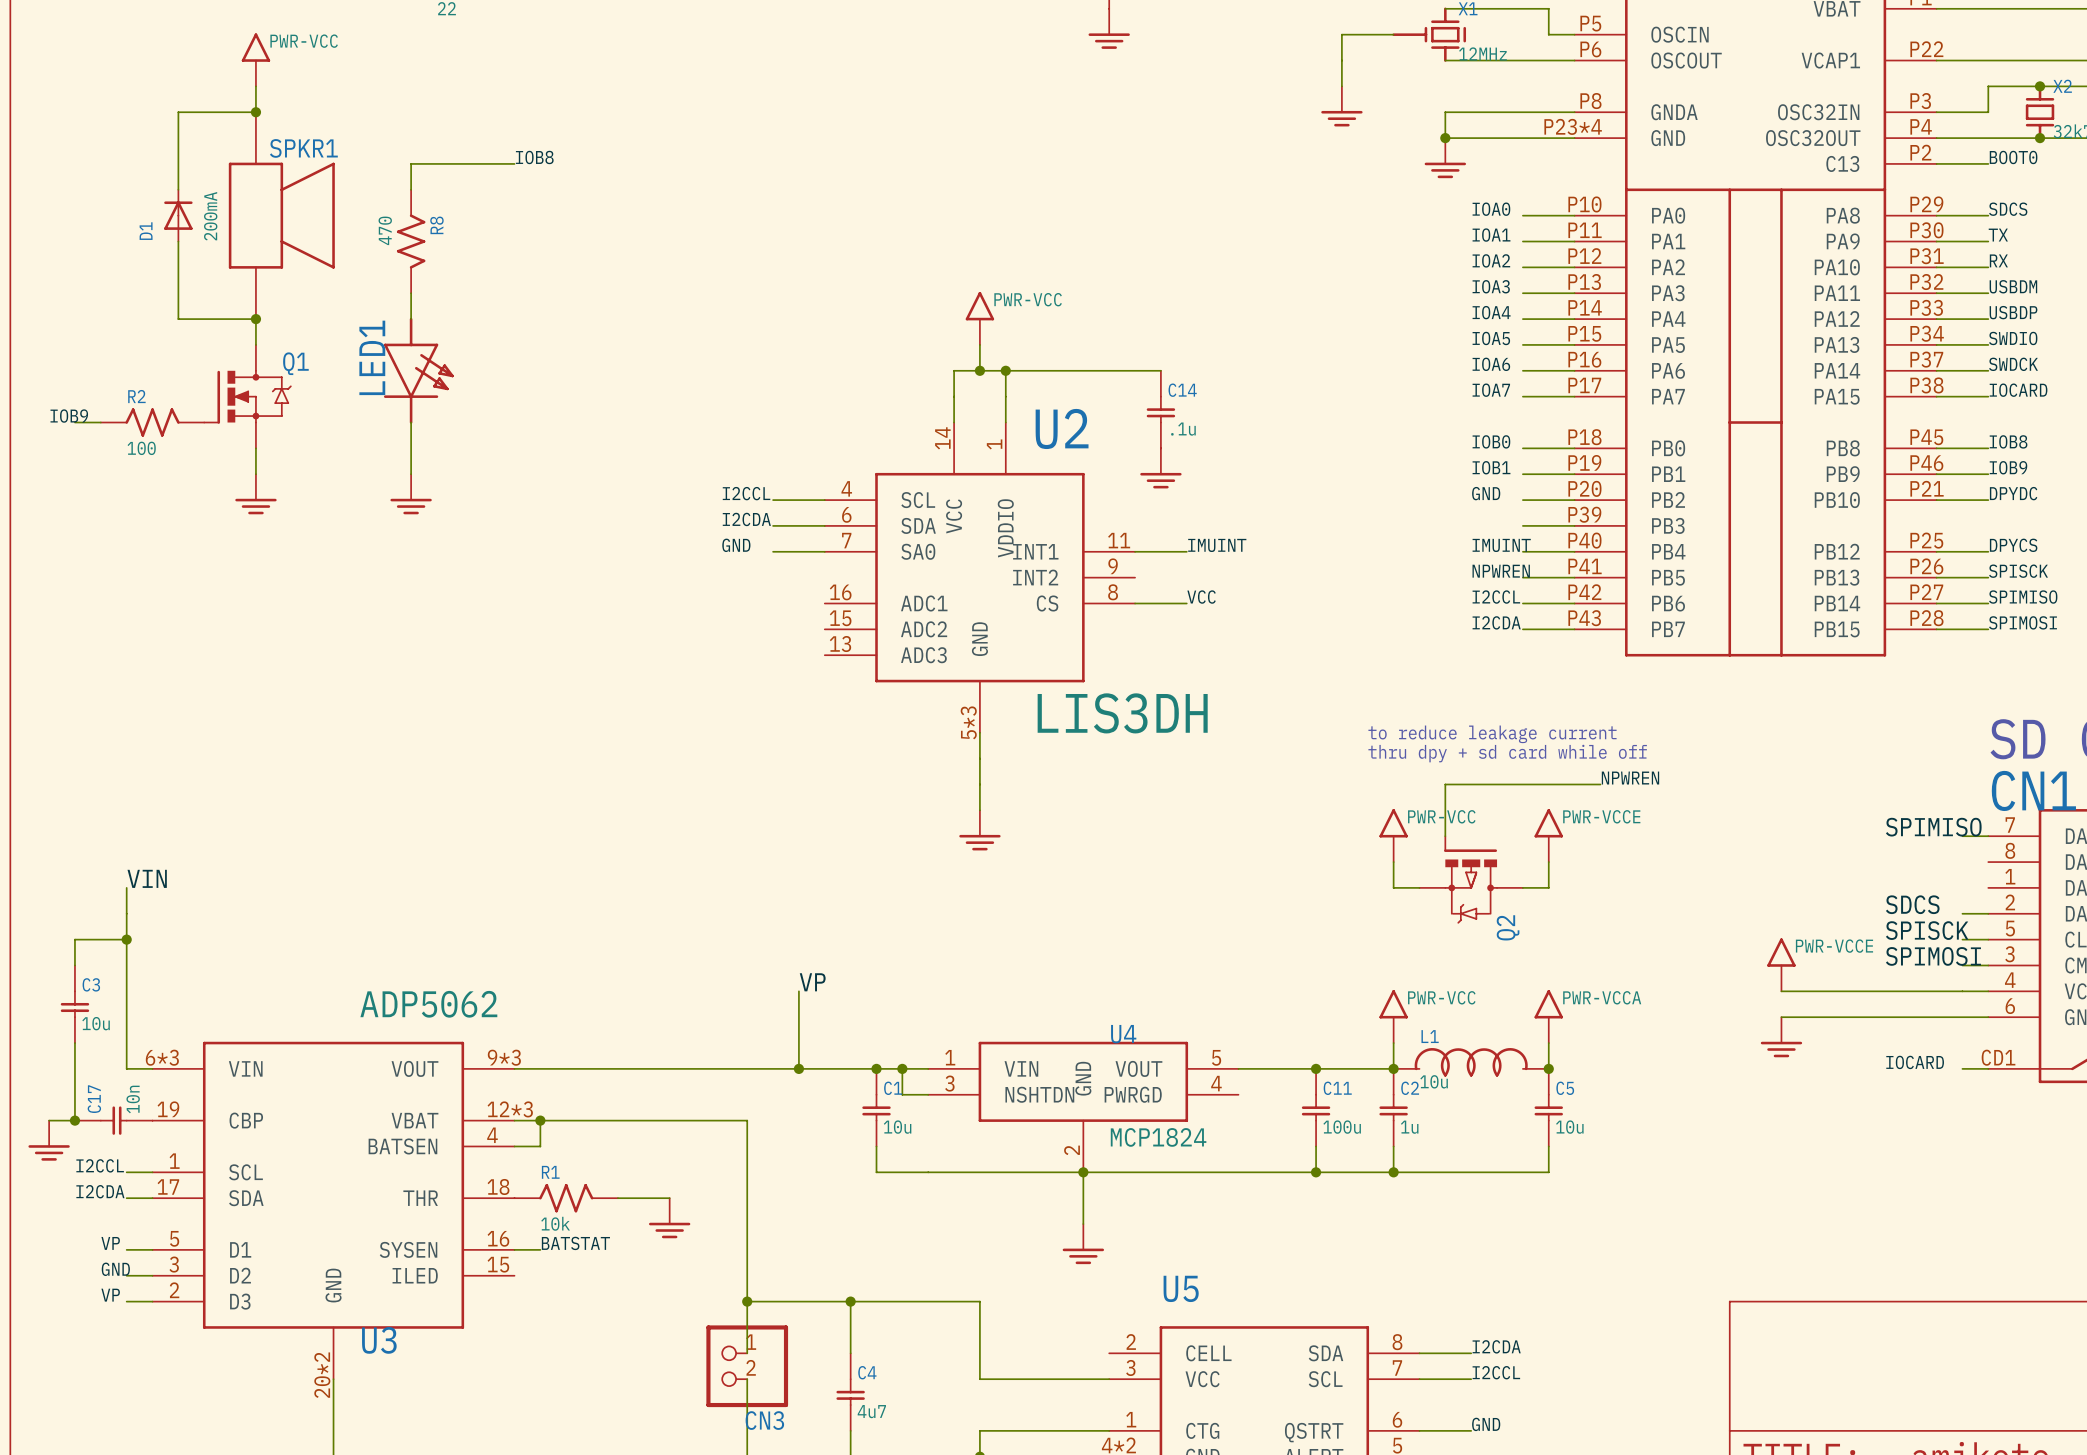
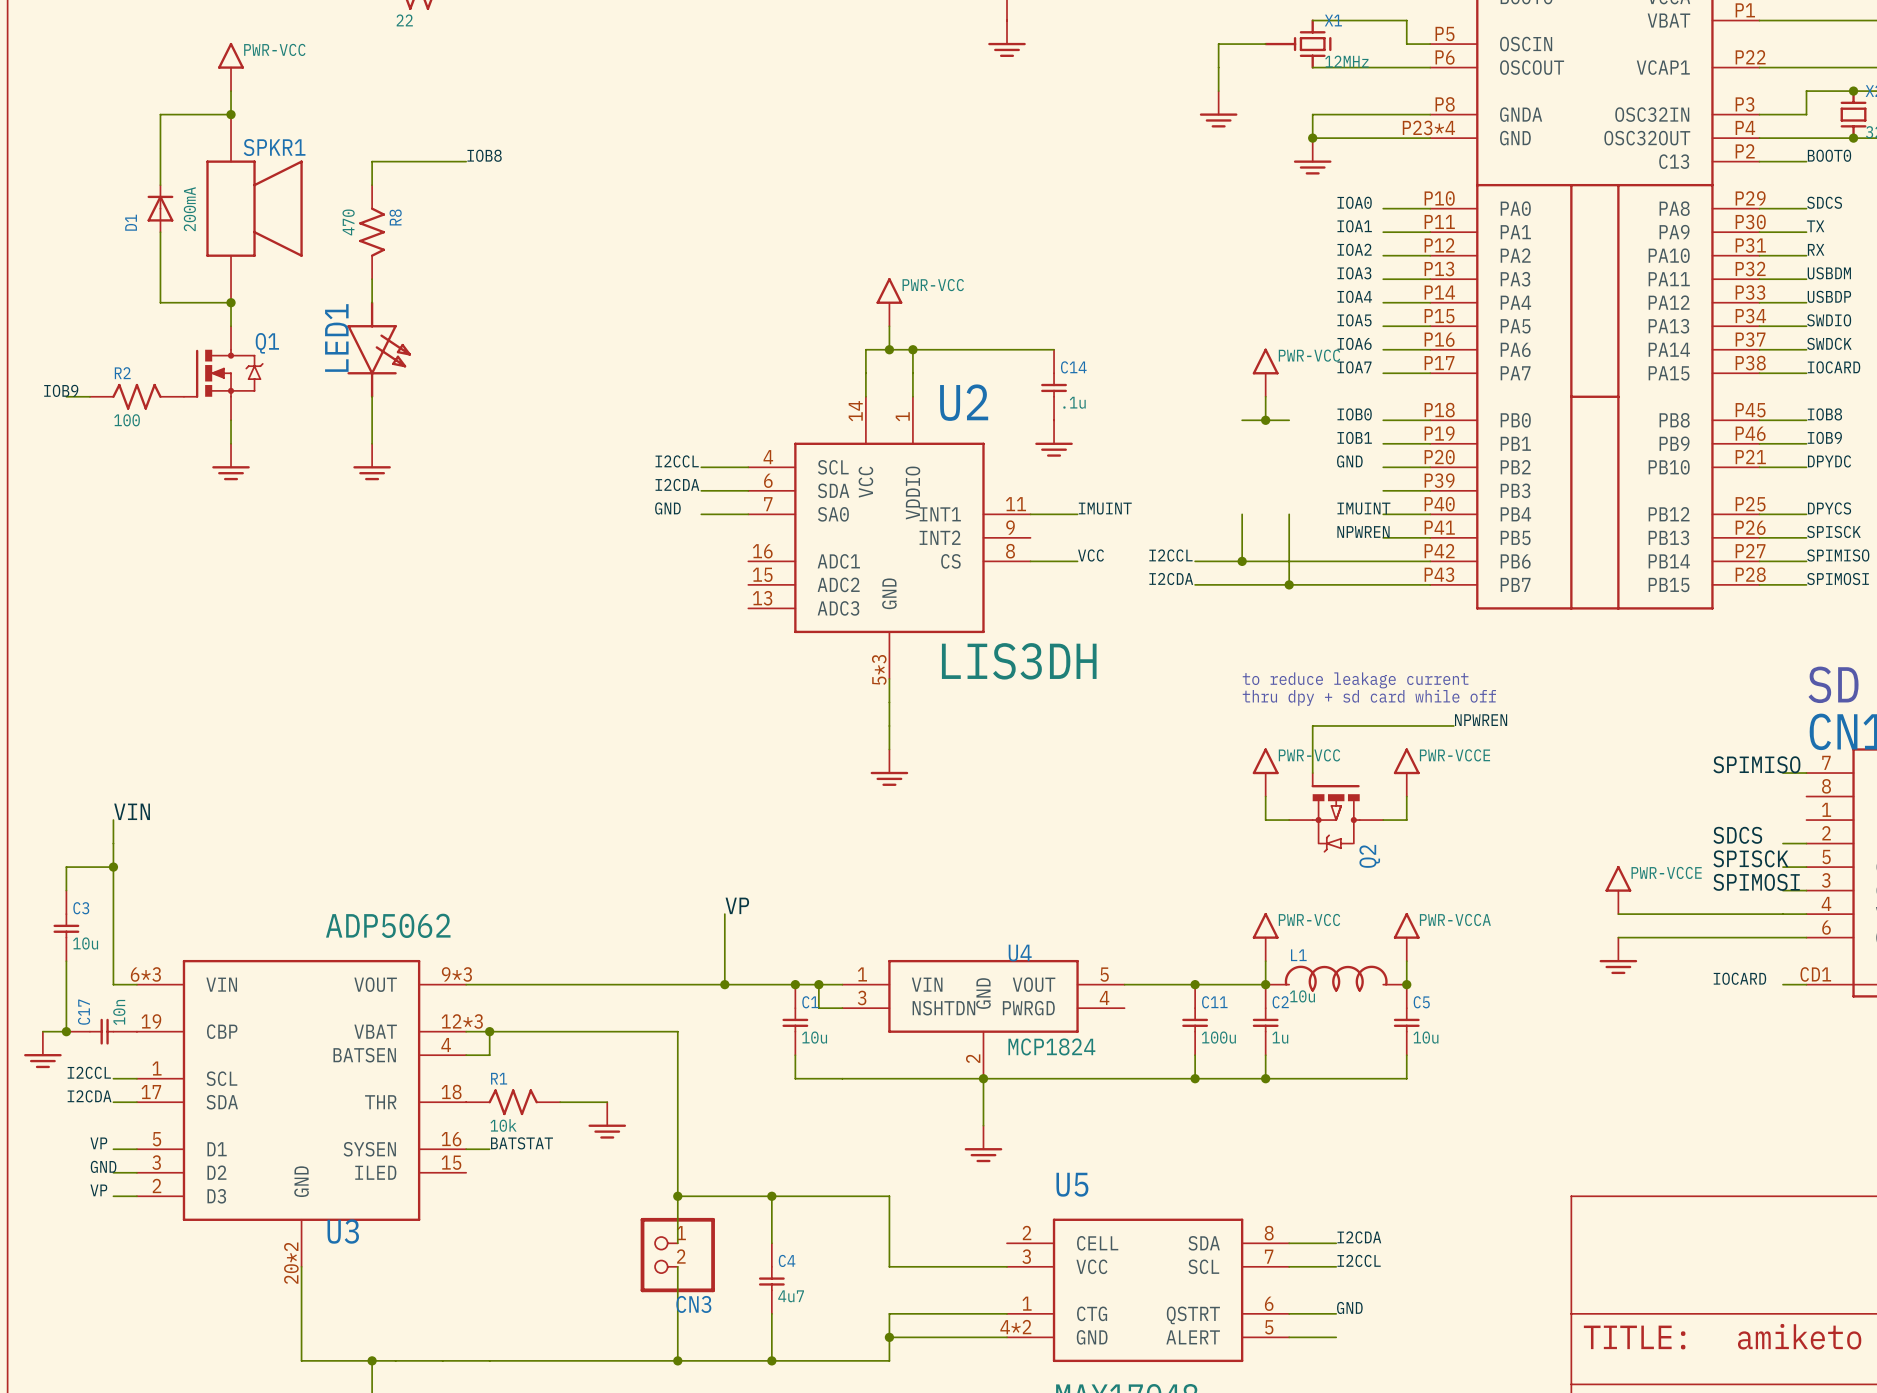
power symbol: none -> PWR-VCC (1265, 372)
wire: none -> (1265, 396) (1265, 420)
wire: none -> (1242, 420) (1289, 420)
junction: none -> (1265, 420)
wire: none -> (1242, 514) (1242, 561)
wire: none -> (1289, 514) (1289, 584)
label position: I2CCL (1496, 597) -> I2CCL (1170, 555)
wire: none -> (1195, 561) (1383, 561)
junction: none -> (1242, 561)
label position: I2CDA (1496, 622) -> I2CDA (1171, 579)
wire: none -> (1195, 584) (1383, 584)
junction: none -> (1289, 584)

